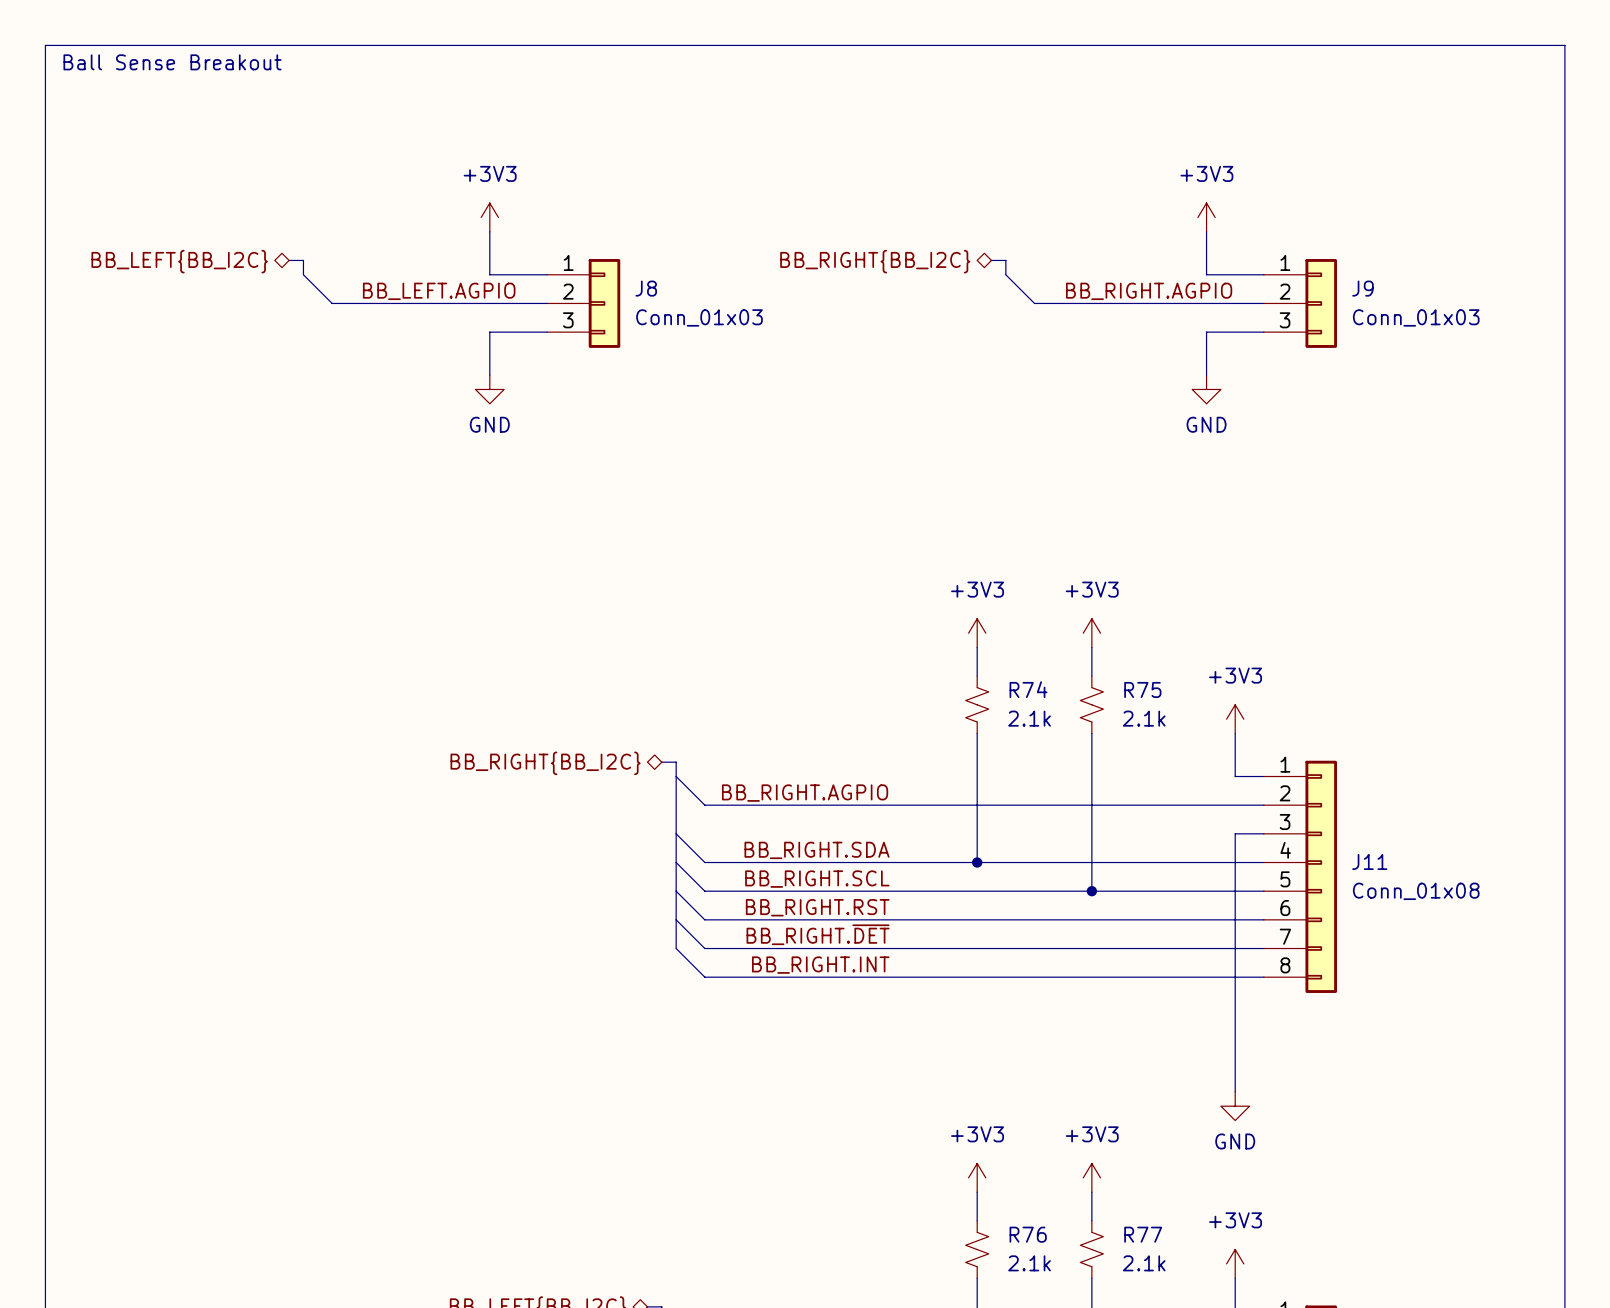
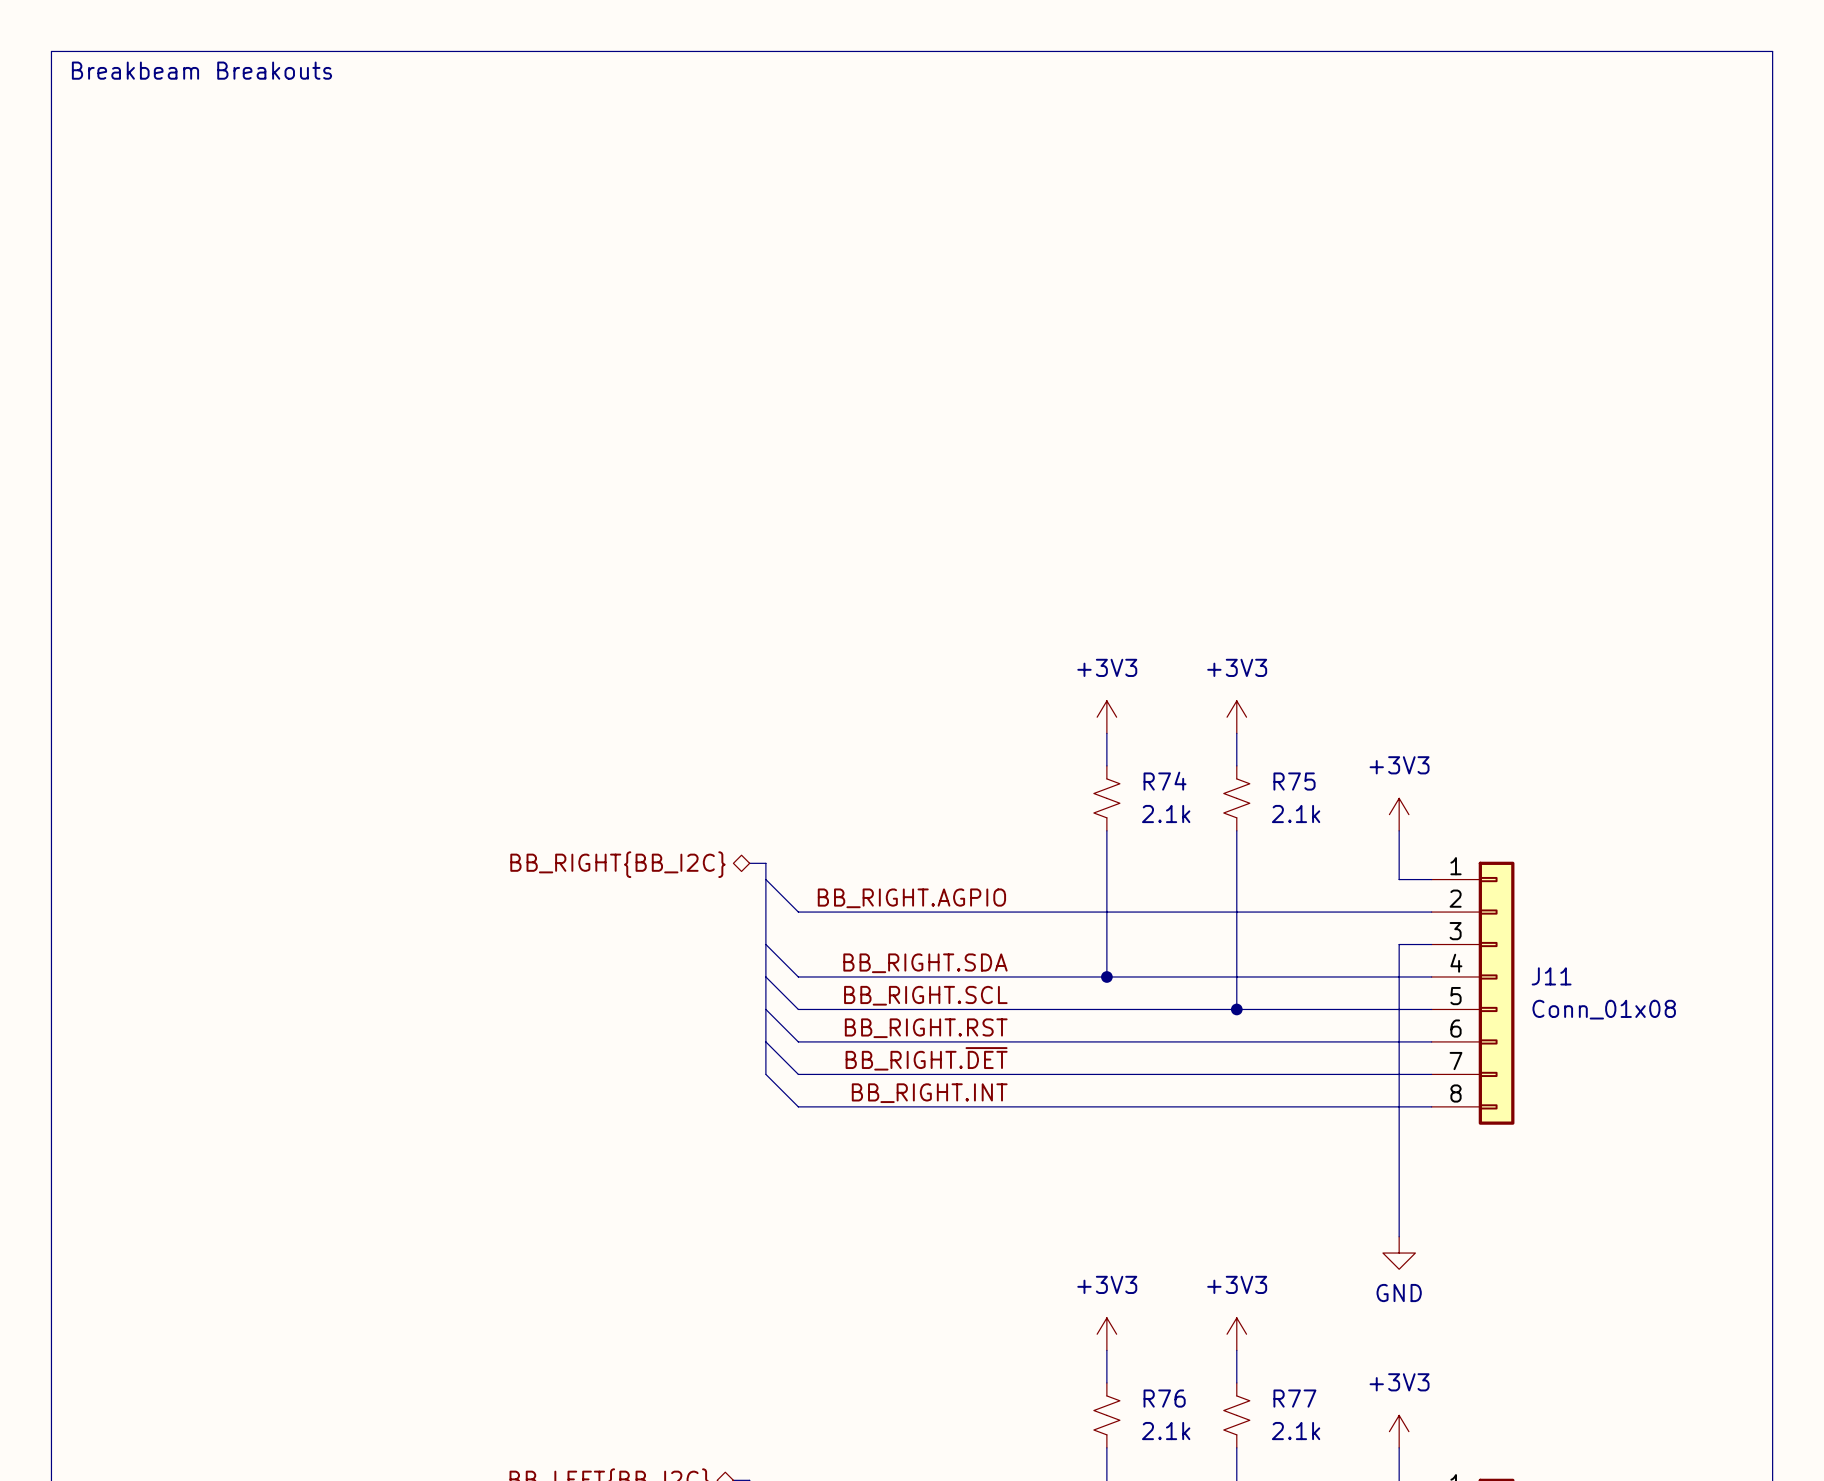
text: Ball Sense Breakout (172, 62) -> Breakbeam Breakouts (201, 70)
power symbol: +3V3 (489, 217) -> none
power symbol: +3V3 (1206, 217) -> none
wire: (489, 231) (489, 274) (547, 274) -> none
wire: (1206, 231) (1206, 274) (1263, 274) -> none
bus: (289, 260) (303, 260) (303, 274) -> none
bus: (991, 260) (1005, 260) (1005, 274) -> none
hierarchical label: BB_LEFT{BB_I2C} (179, 261) -> none
hierarchical label: BB_RIGHT{BB_I2C} (875, 261) -> none
wire: (303, 274) (332, 303) (547, 303) -> none
wire: (1005, 274) (1034, 303) (1263, 303) -> none
label: BB_LEFT.AGPIO (439, 291) -> none
label: BB_RIGHT.AGPIO (1149, 291) -> none
J8: Conn_01x03 (583, 303) -> none
J9: Conn_01x03 (1300, 303) -> none
wire: (547, 332) (489, 332) (489, 375) -> none
wire: (1263, 332) (1206, 332) (1206, 375) -> none
power symbol: GND (489, 389) -> none
power symbol: GND (1206, 389) -> none

